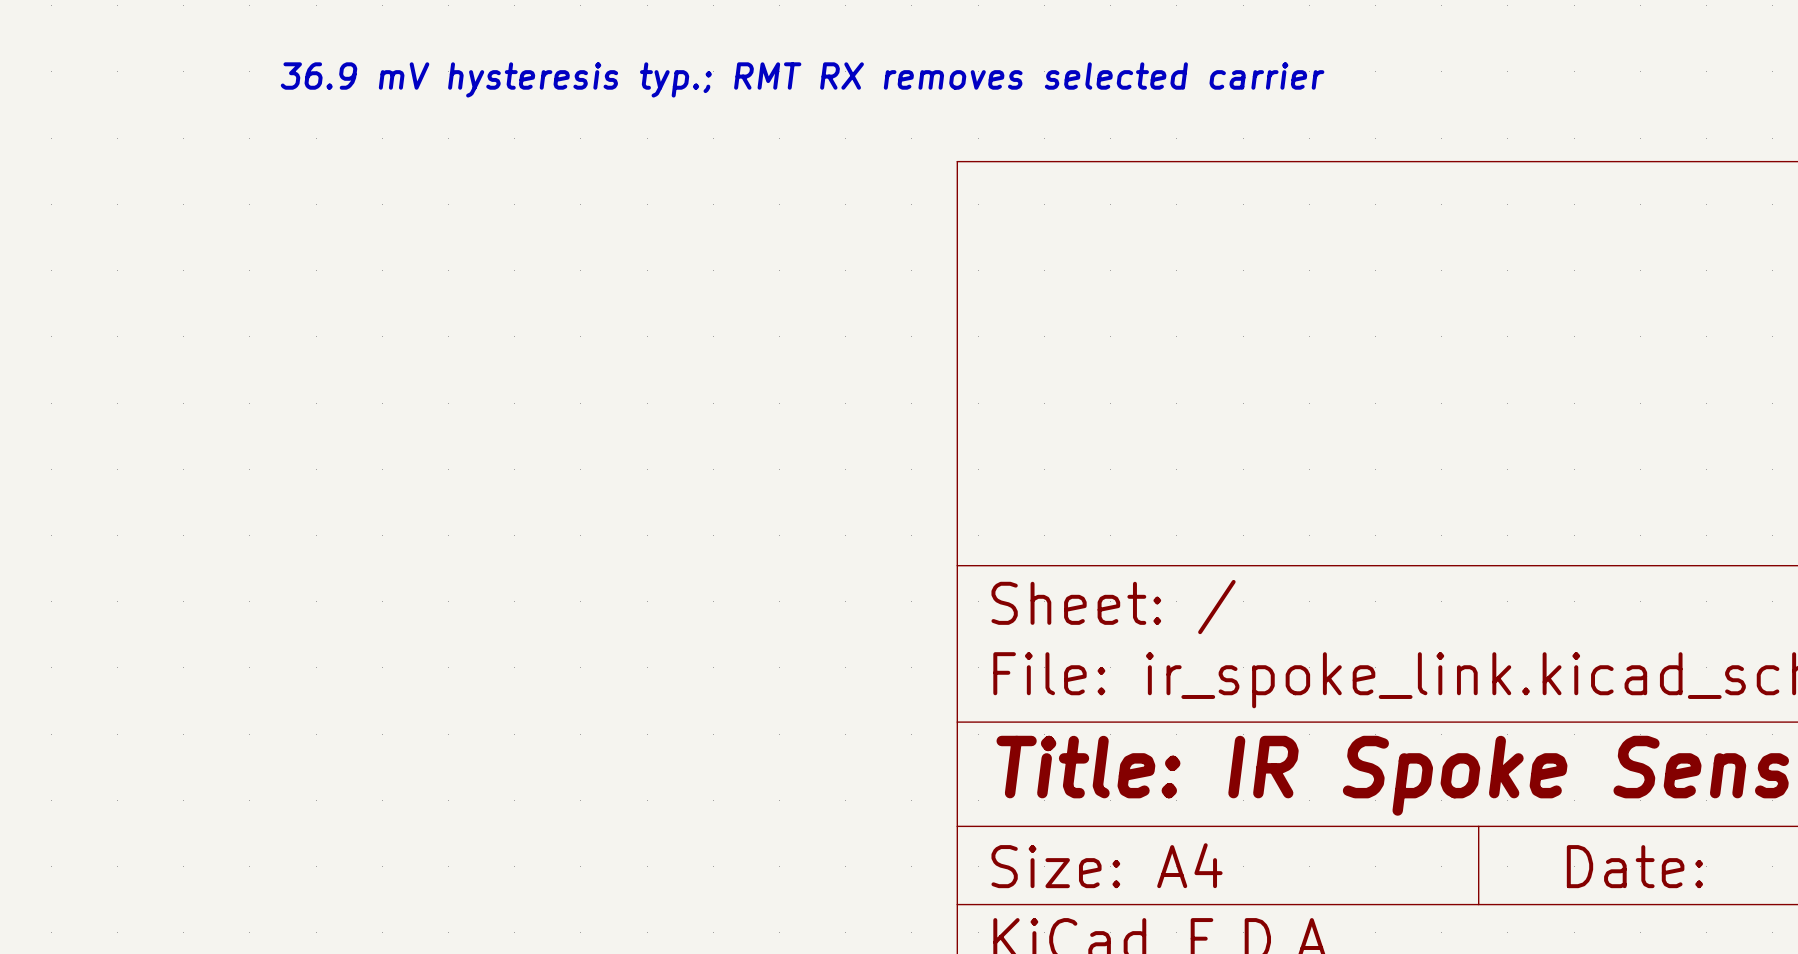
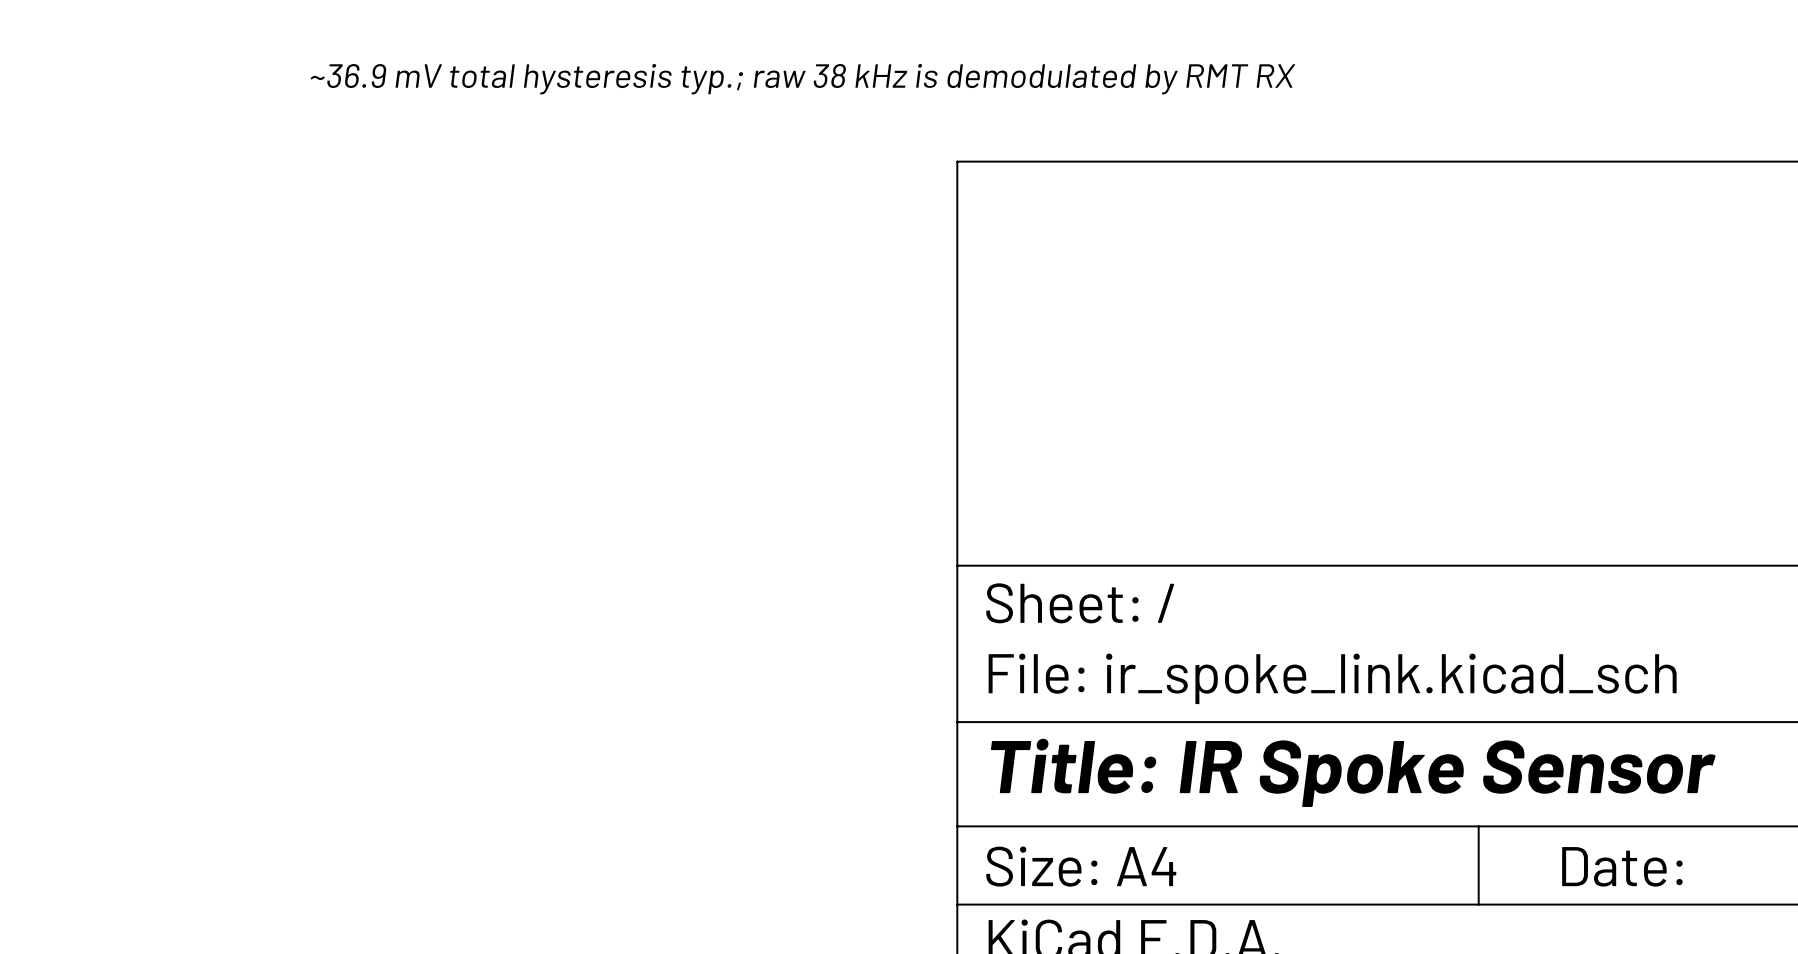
text: 36.9 mV hysteresis typ.; RMT RX removes selected carrier (802, 79) -> ~36.9 mV total hysteresis typ.; raw 38 kHz is demodulated by RMT RX (802, 79)

